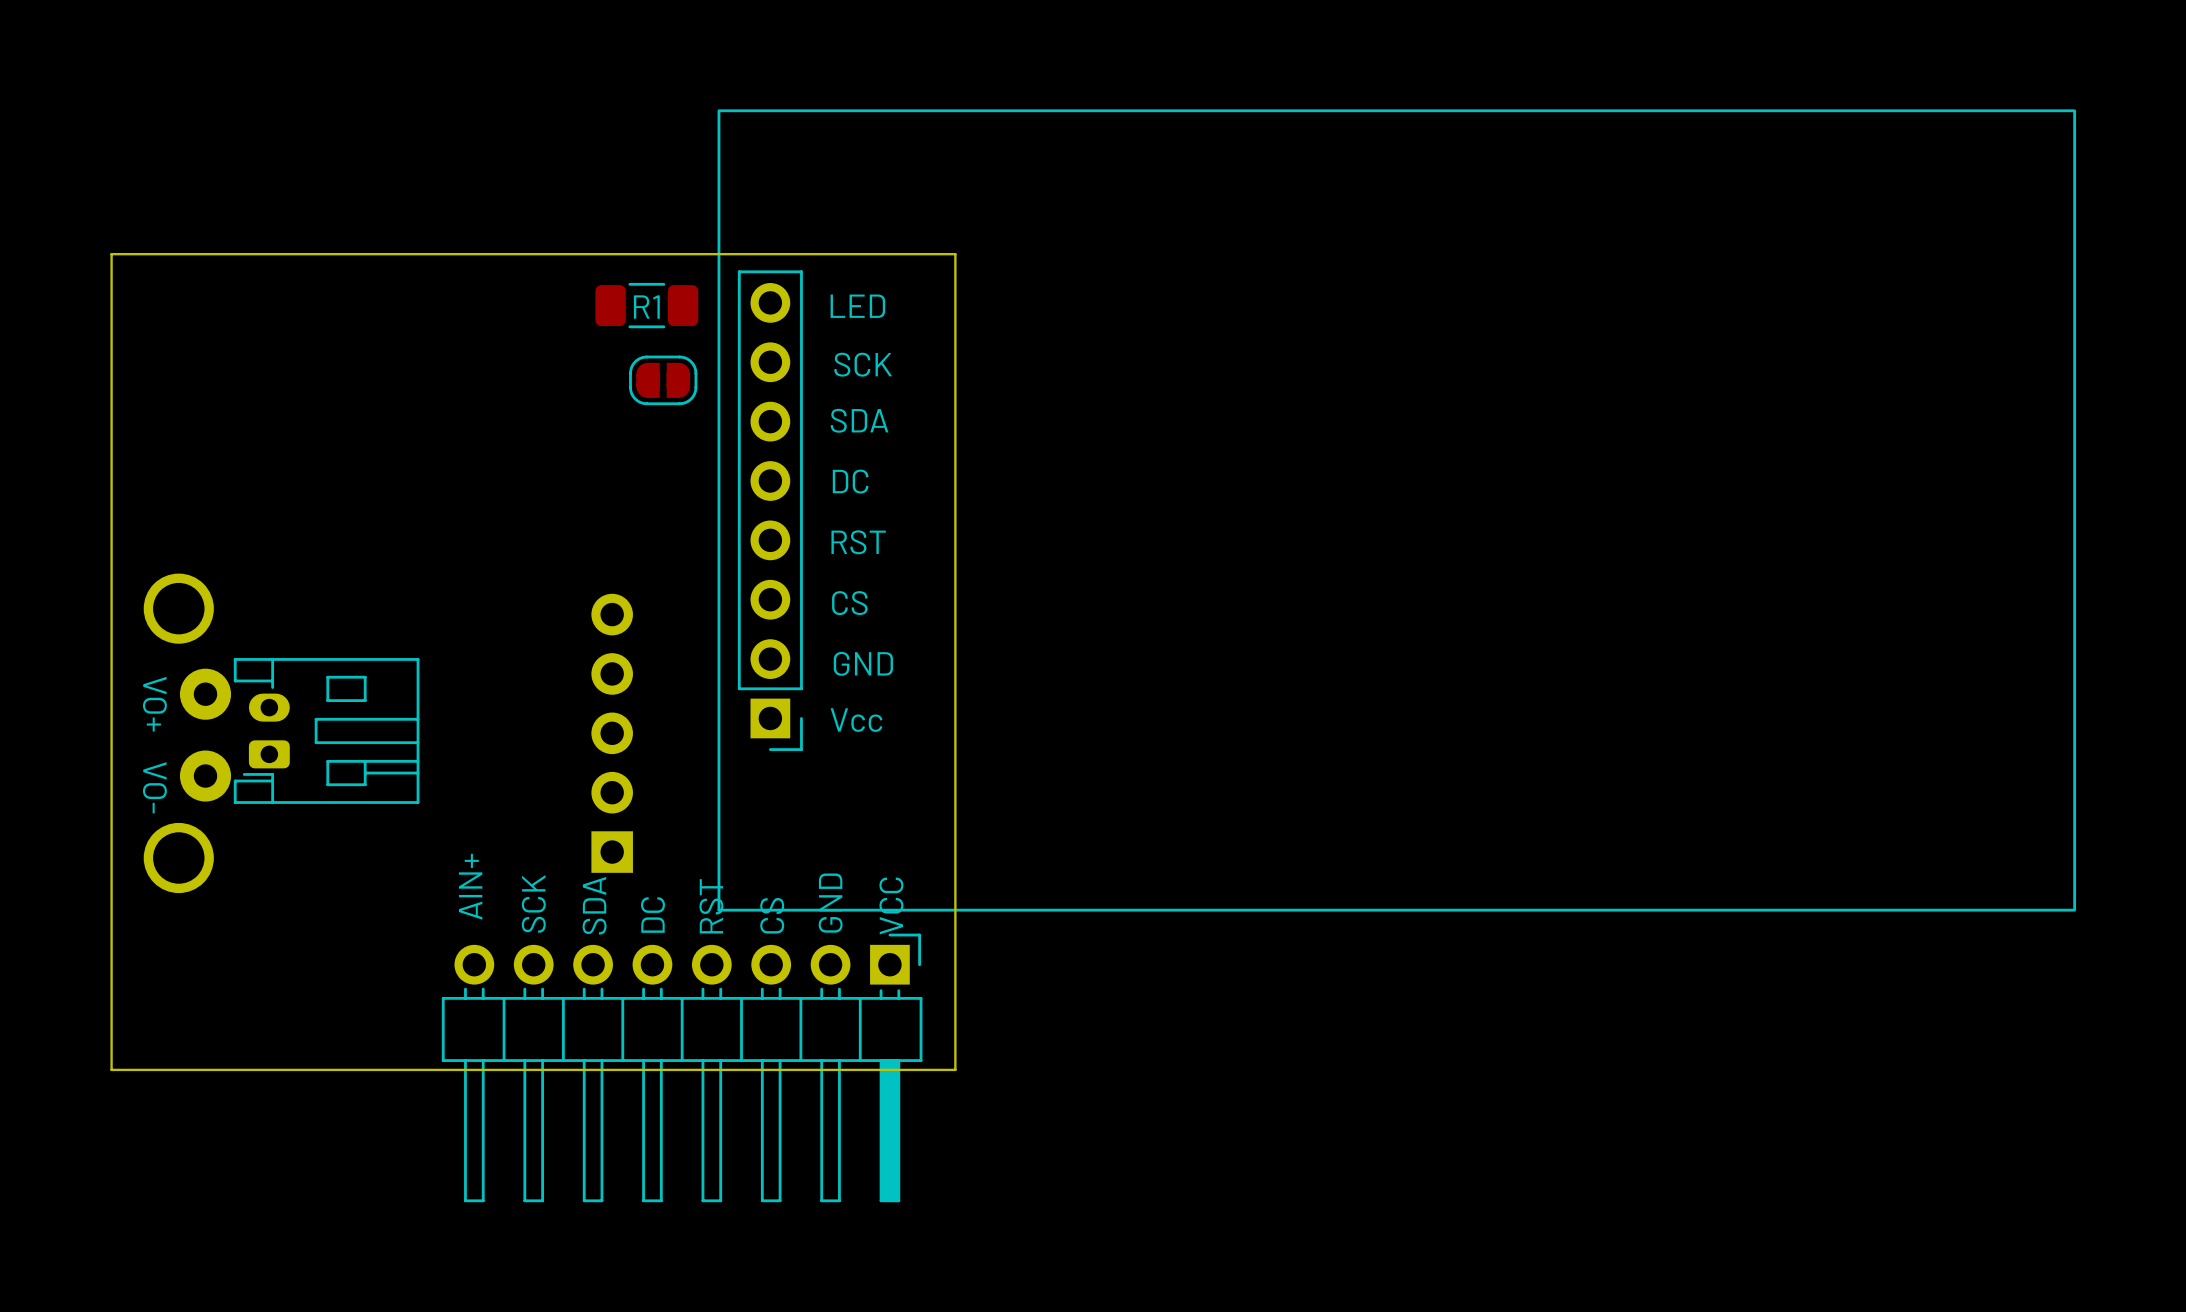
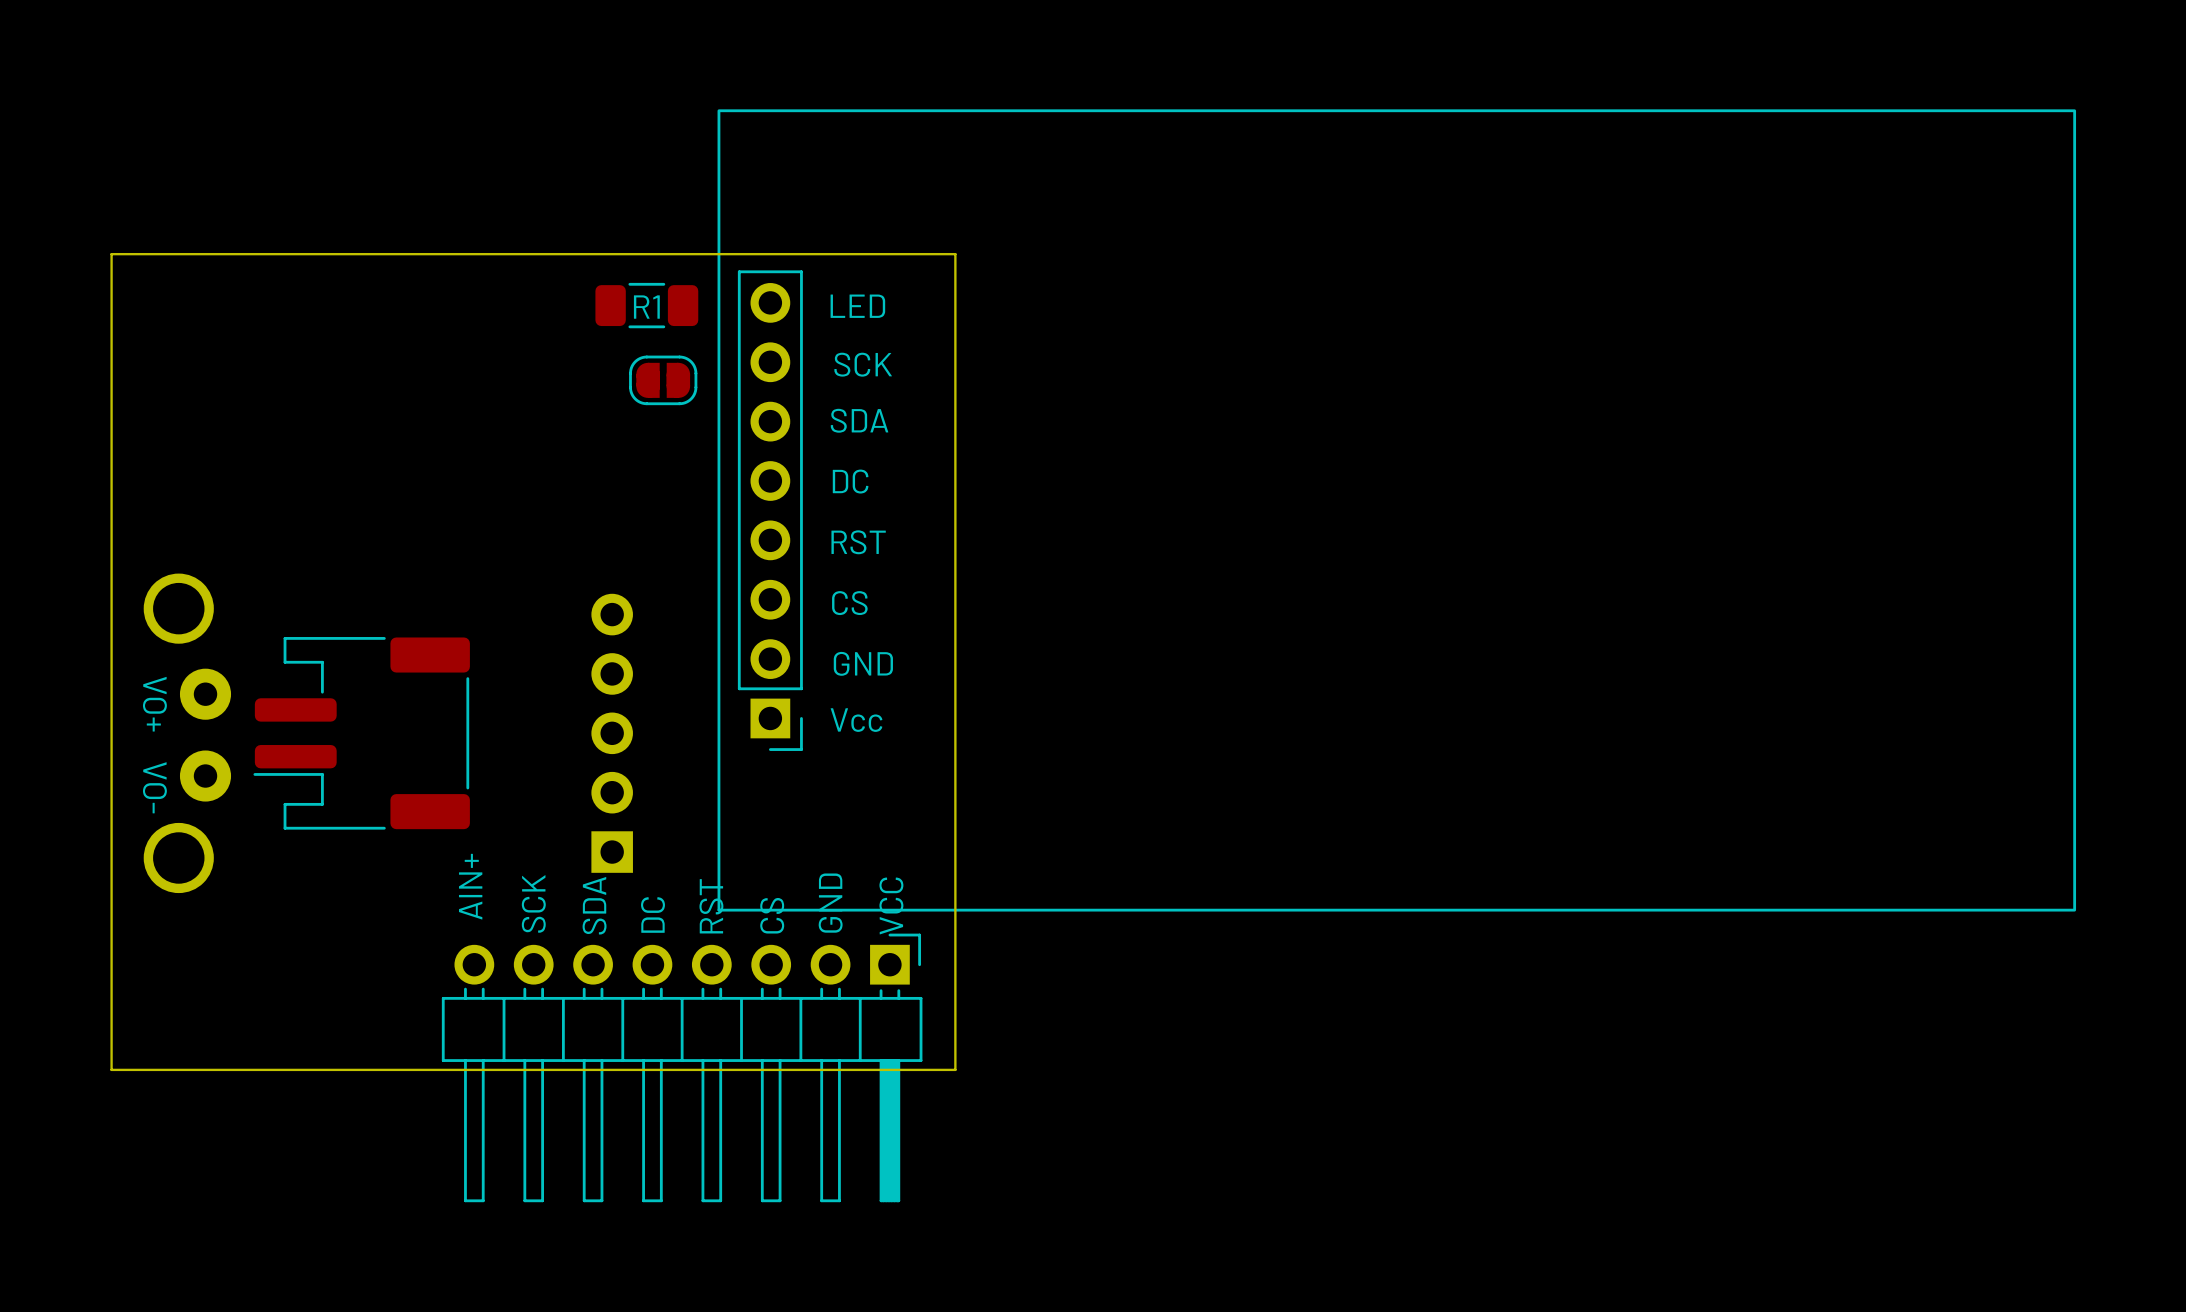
part: (326, 730) -> none
part: none -> (361, 733)

